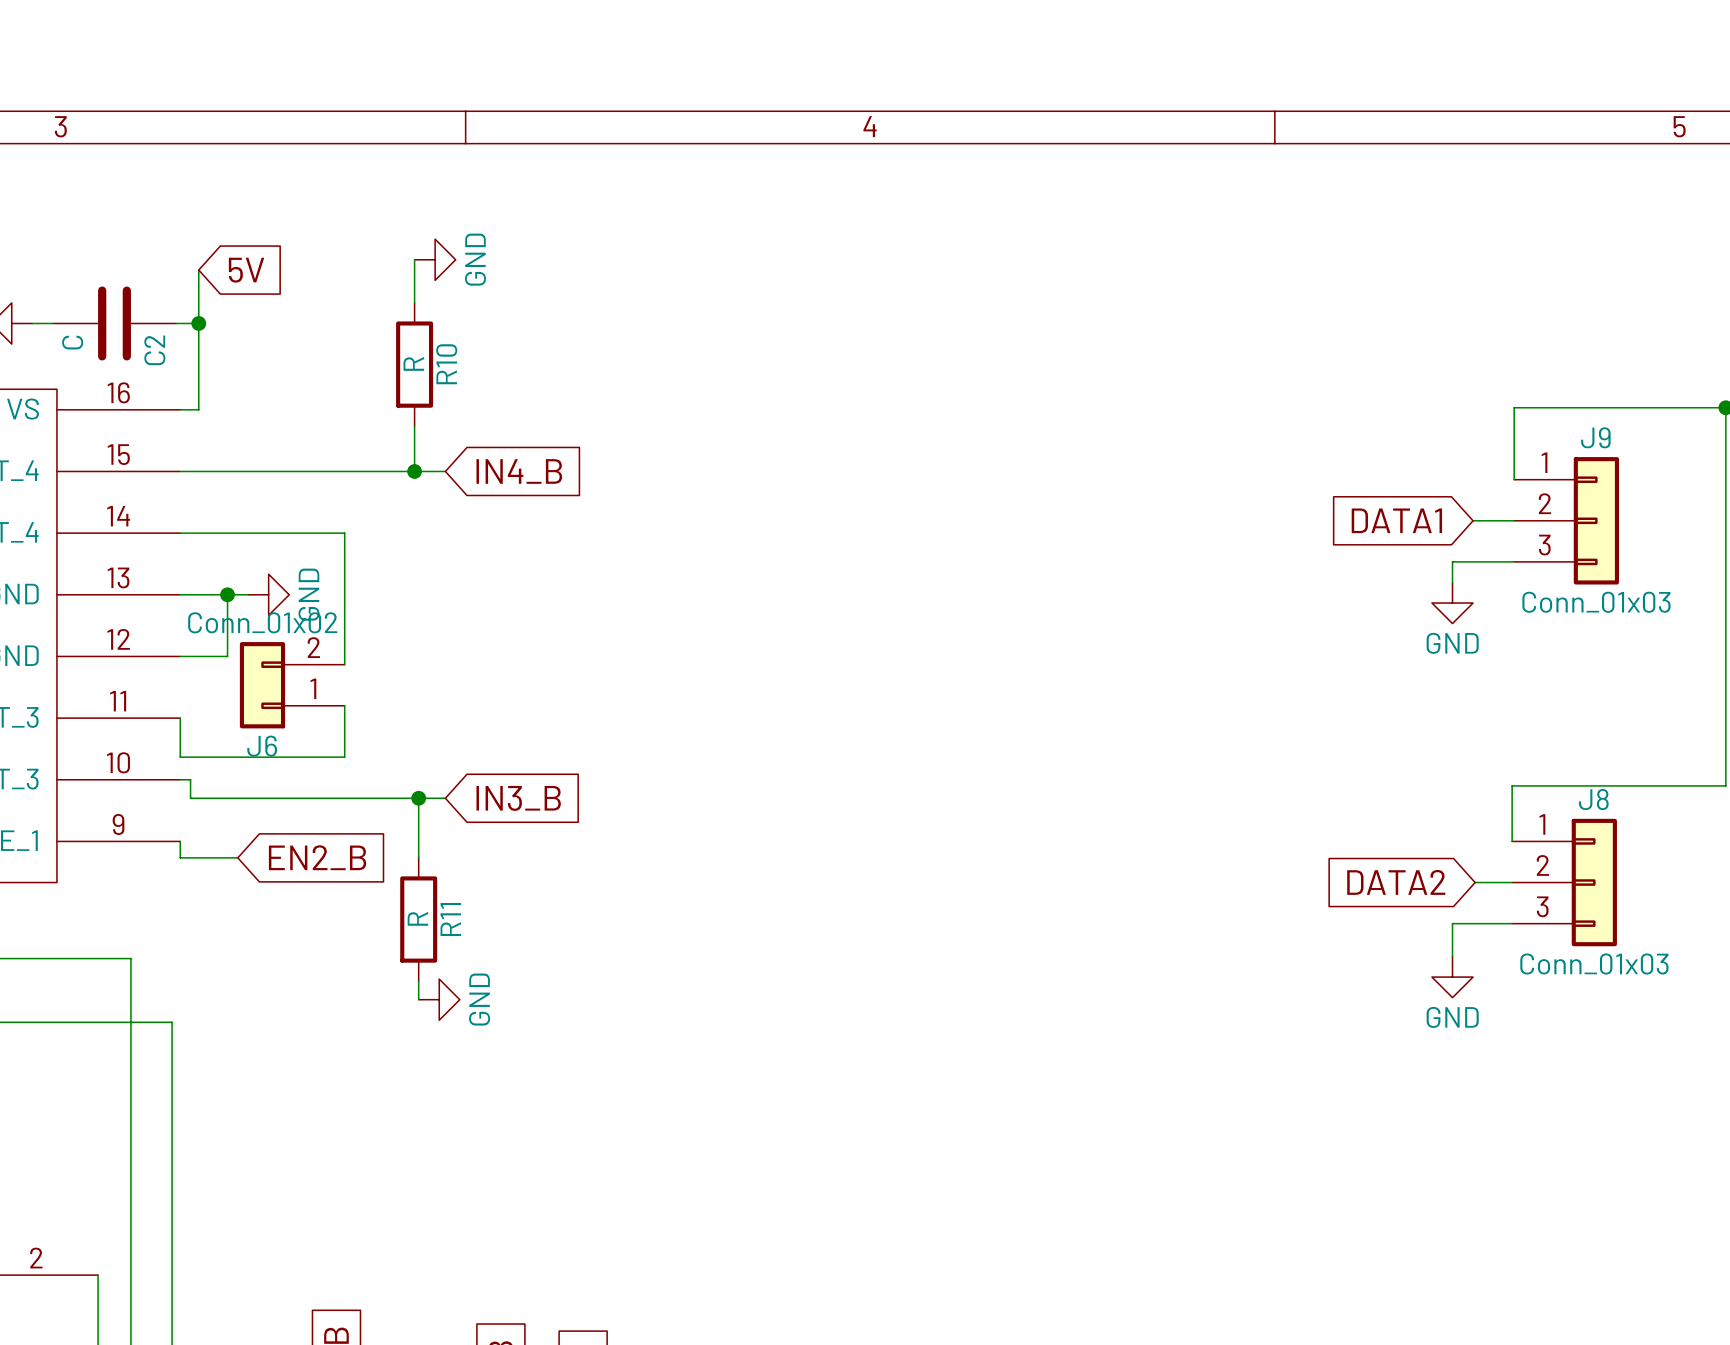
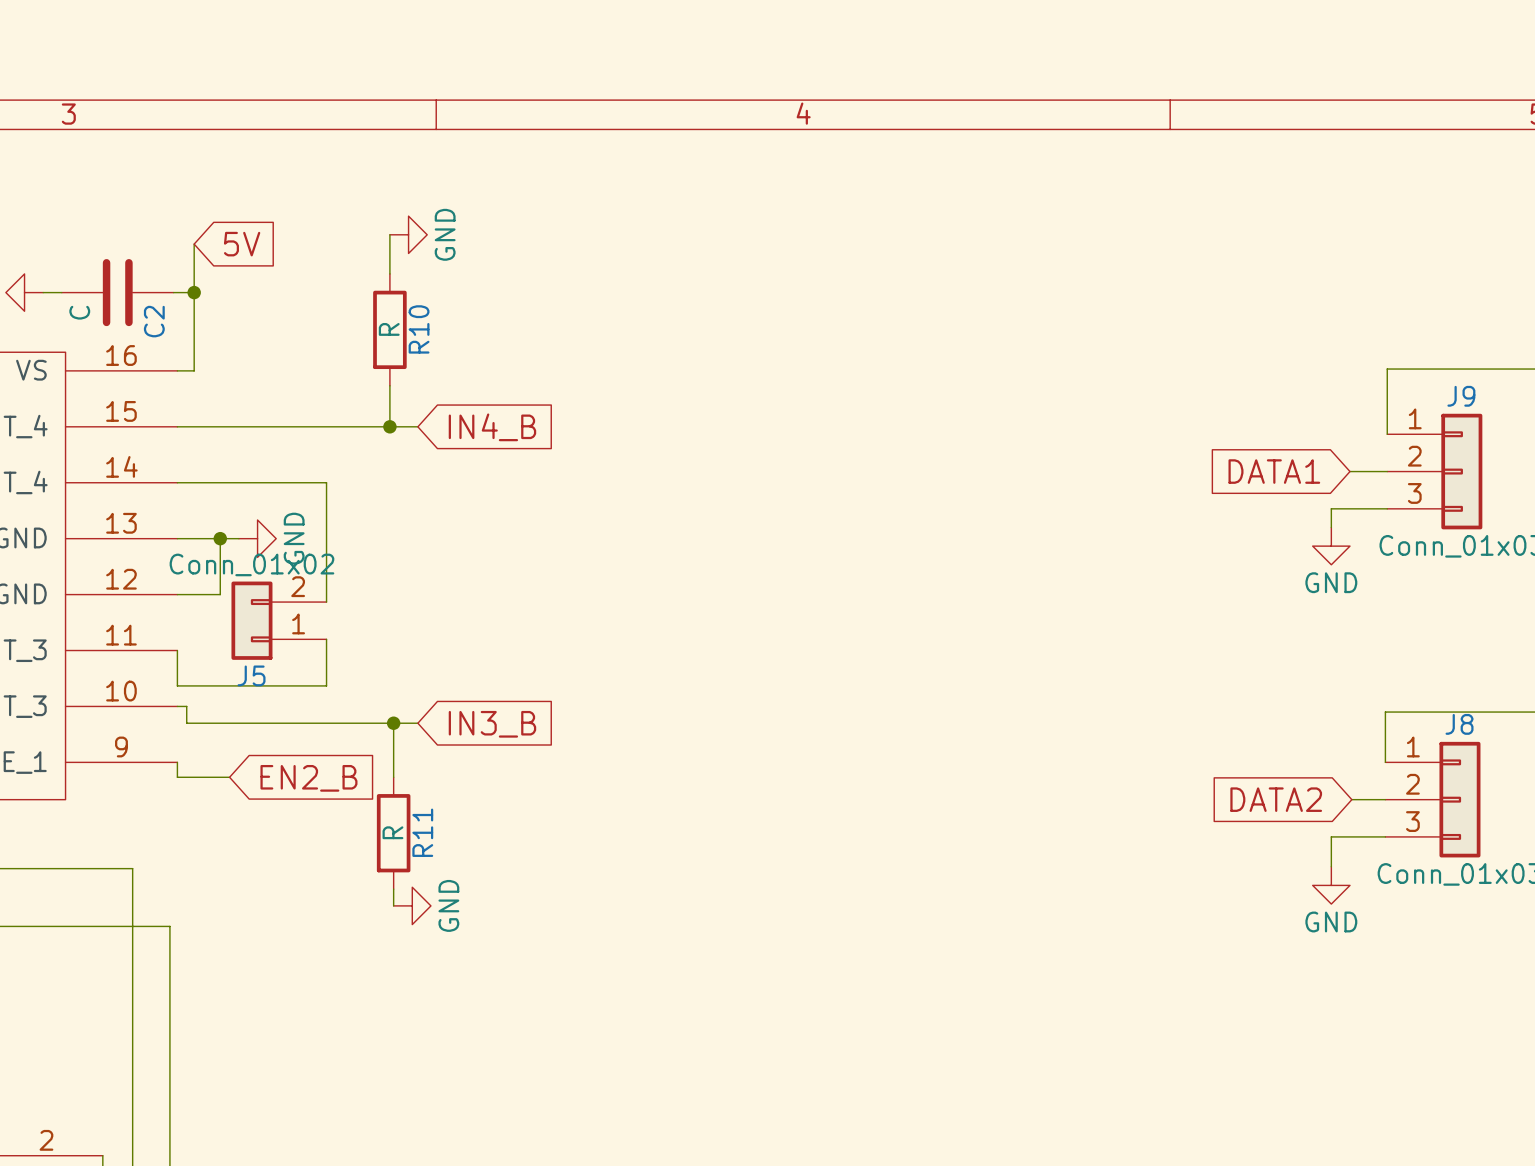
J6 name: J6 (262, 746) -> J5 (251, 675)

